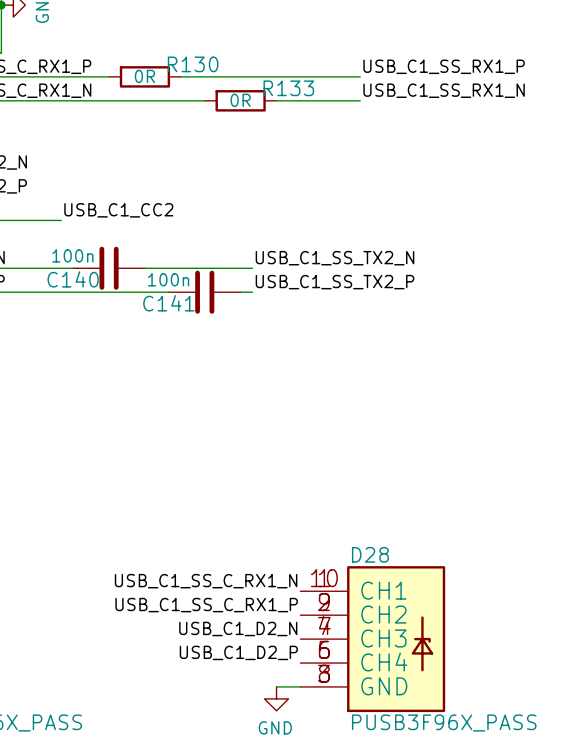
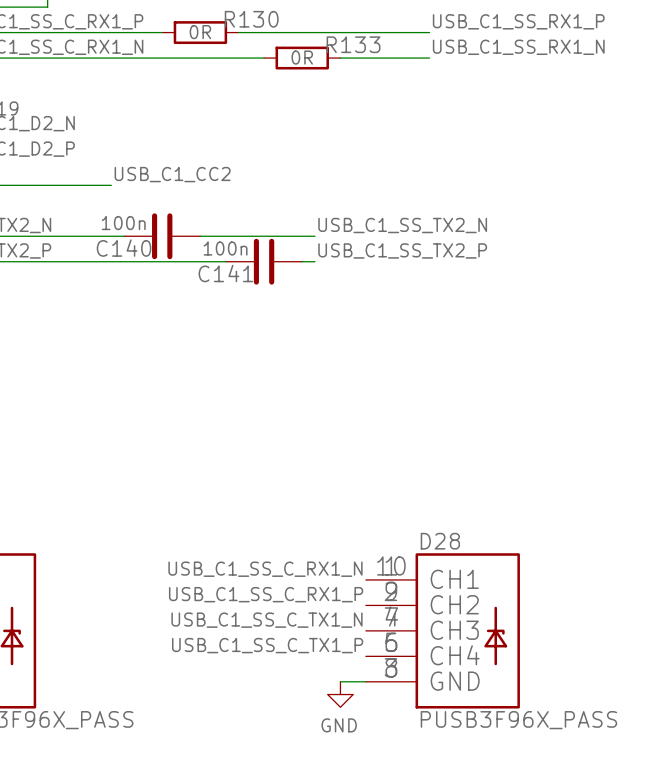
label: USB_C1_D2_N (238, 629) -> USB_C1_SS_C_TX1_N (266, 620)
label: USB_C1_D2_P (238, 652) -> USB_C1_SS_C_TX1_P (267, 645)

